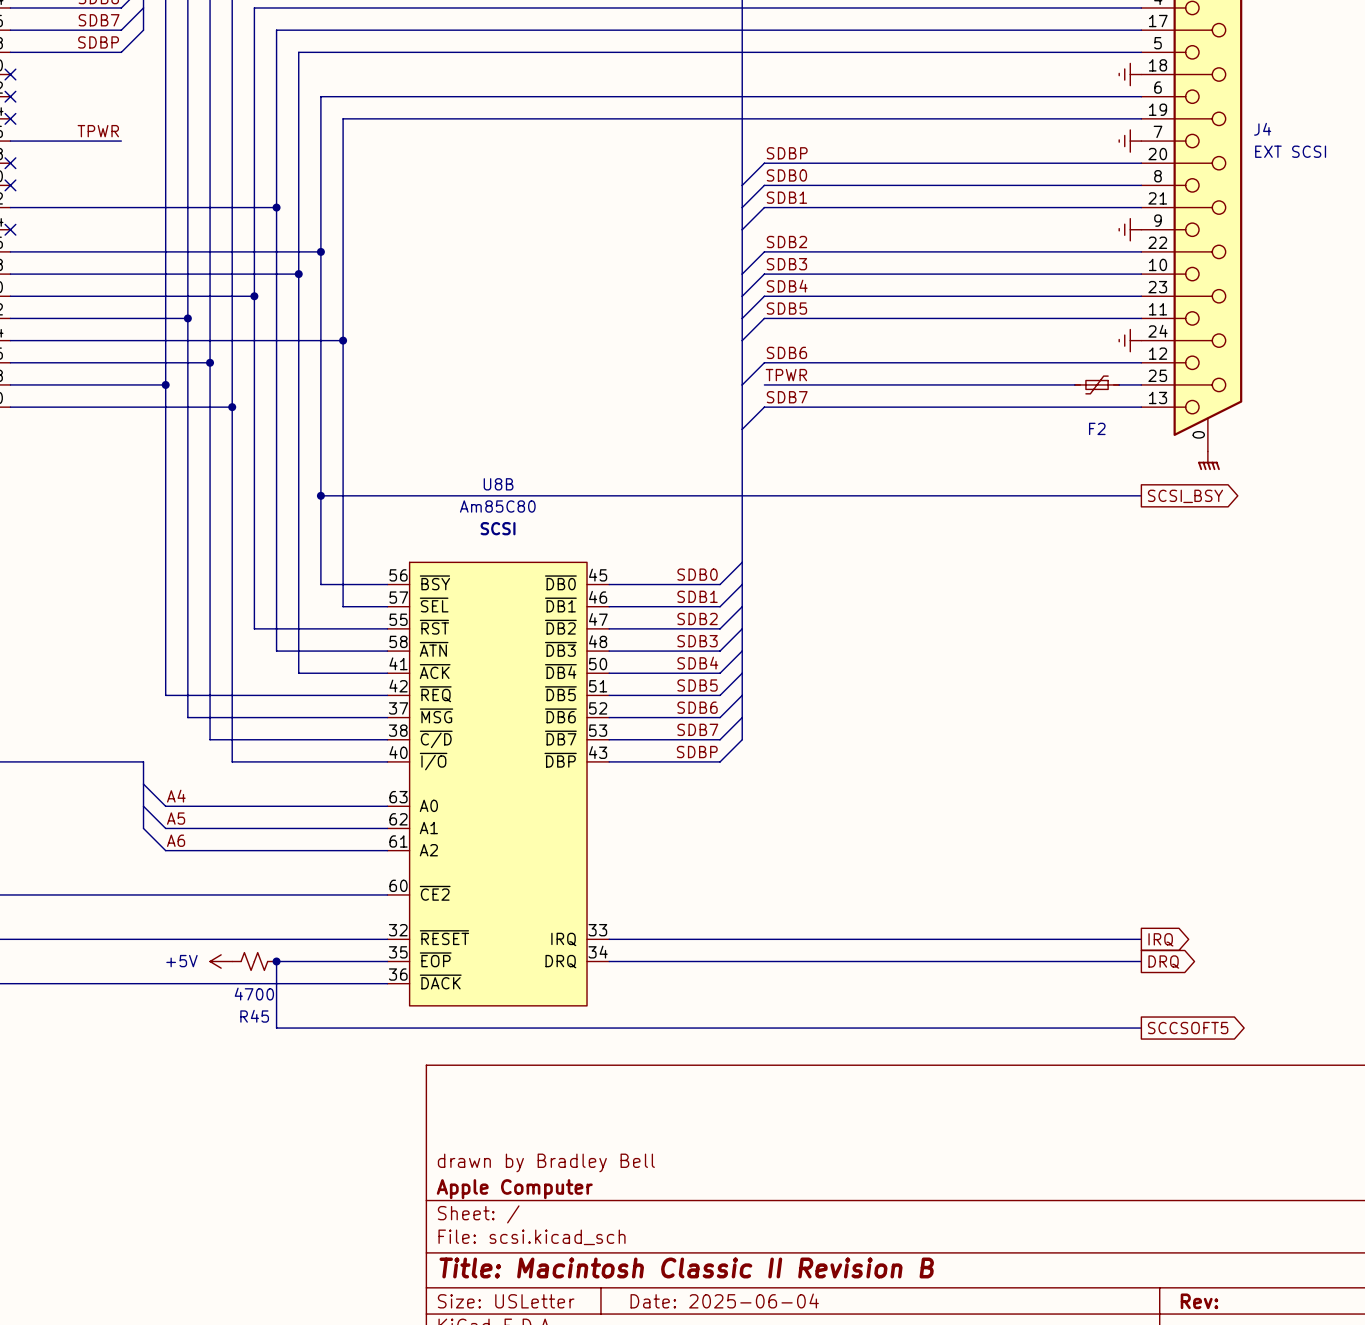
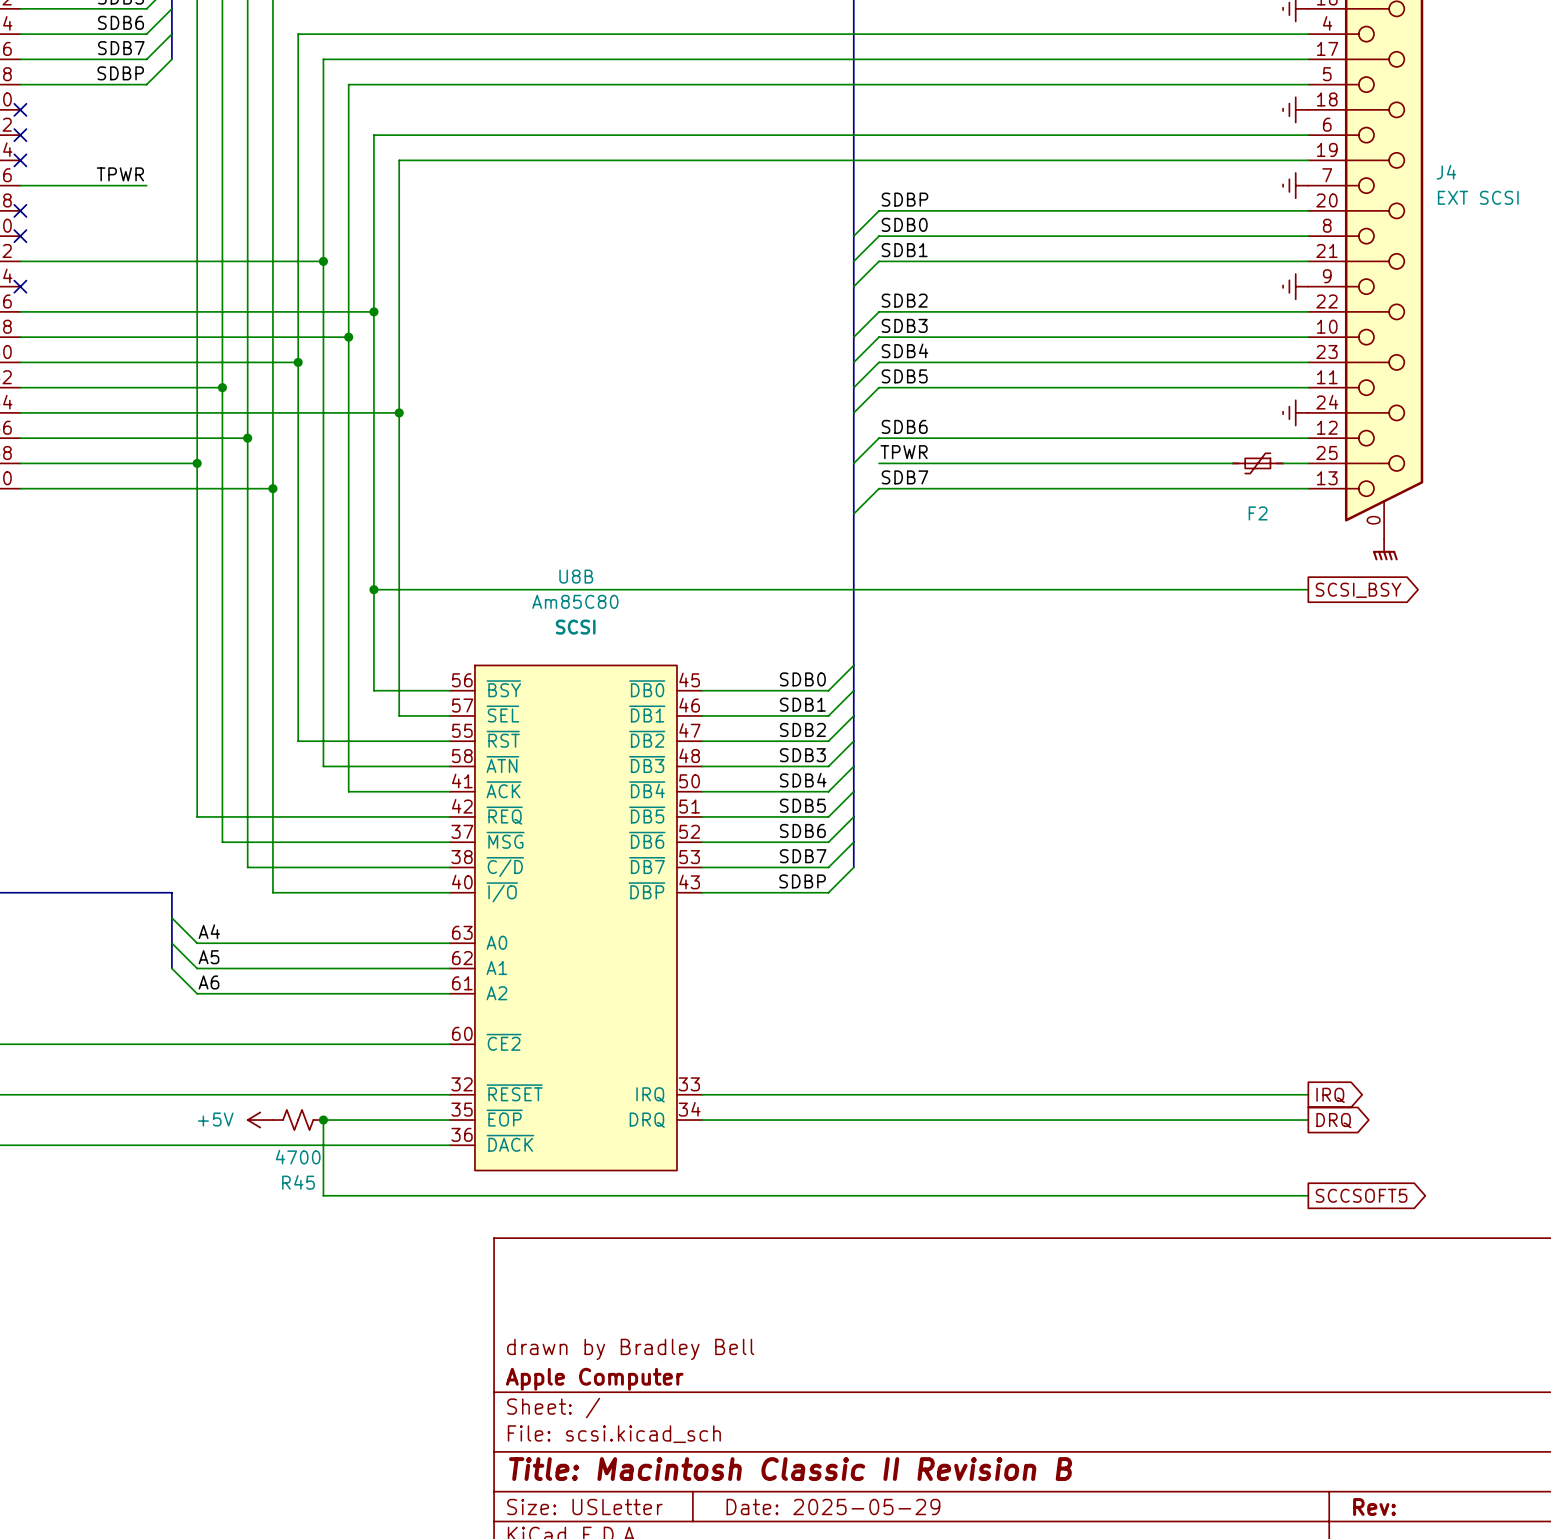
title block: Date: 2025-06-04 (724, 1301) -> Date: 2025-05-29 (833, 1507)

